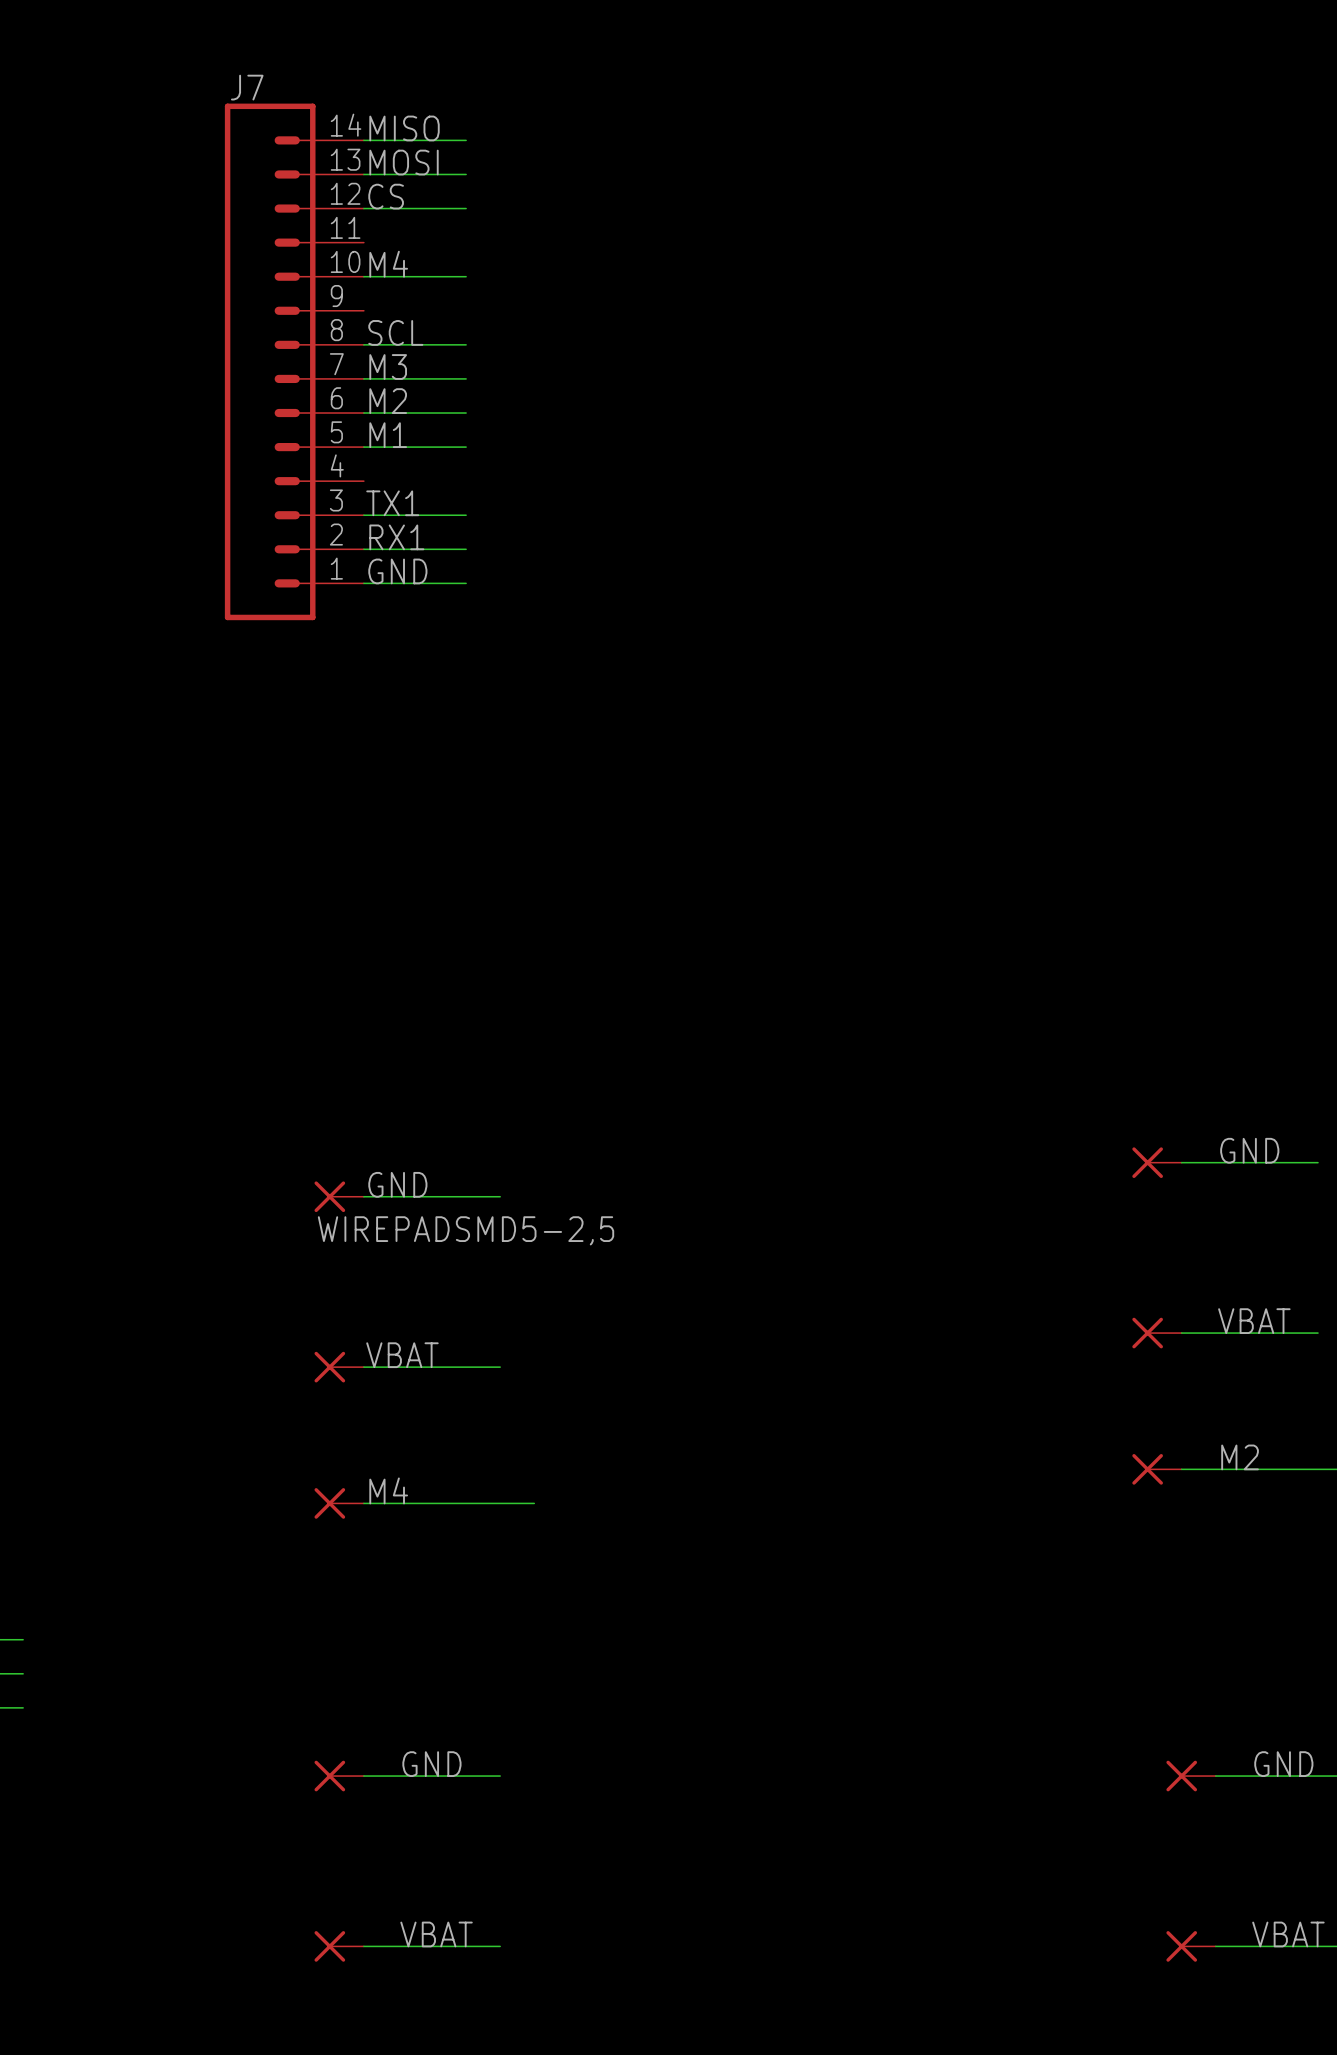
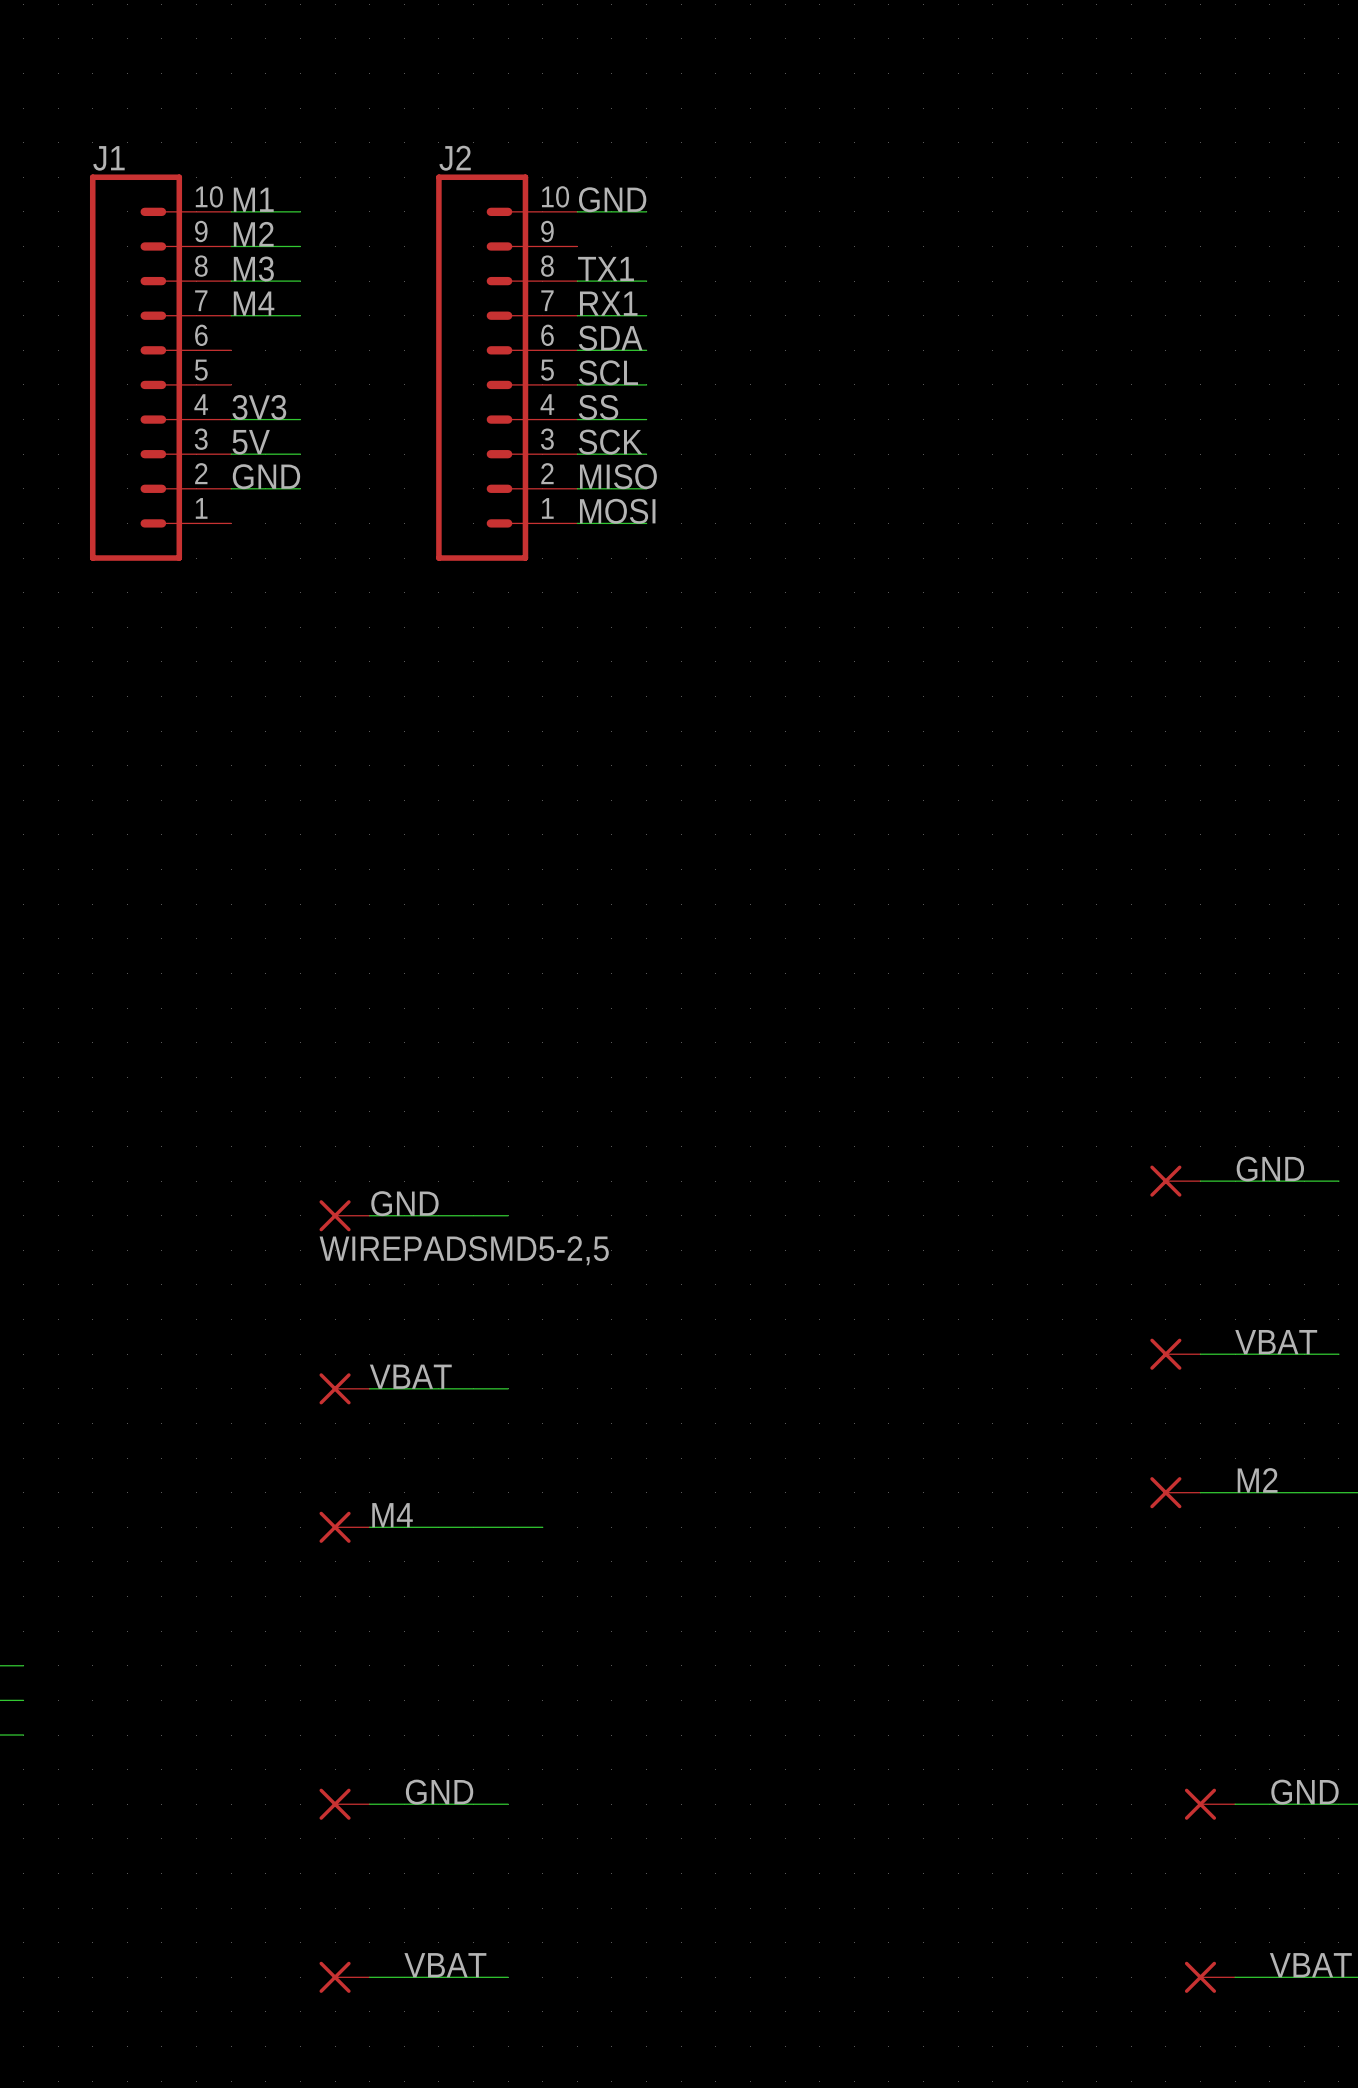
label: MISO (404, 128) -> none
wire: (363, 140) (466, 140) -> none
label: MOSI (404, 162) -> none
wire: (363, 174) (466, 174) -> none
label: CS (386, 196) -> none
label: none -> GND (612, 199)
wire: none -> (231, 211) (300, 211)
wire: (363, 208) (466, 208) -> none
wire: none -> (577, 211) (646, 211)
wire: none -> (231, 246) (300, 246)
label position: M4 (388, 264) -> M4 (254, 303)
wire: none -> (231, 281) (300, 281)
wire: (363, 276) (466, 276) -> none
wire: none -> (577, 281) (646, 281)
wire: none -> (231, 315) (300, 315)
wire: none -> (577, 315) (646, 315)
label position: SCL (395, 332) -> SCL (608, 372)
label: none -> SDA (610, 338)
wire: (363, 344) (466, 344) -> none
wire: none -> (577, 350) (646, 350)
J1: none -> (160, 367)
J7: (294, 361) -> none
J2: none -> (506, 367)
label position: M3 (388, 367) -> M3 (253, 268)
wire: (363, 378) (466, 378) -> none
wire: none -> (577, 384) (646, 384)
label: none -> 3V3 (259, 407)
label position: M2 (388, 401) -> M2 (253, 234)
label: none -> SS (598, 407)
wire: none -> (231, 419) (300, 419)
wire: (363, 413) (466, 413) -> none
wire: none -> (577, 419) (646, 419)
label: none -> 5V (251, 442)
label position: M1 (388, 435) -> M1 (253, 199)
label: none -> SCK (610, 442)
wire: none -> (231, 454) (300, 454)
wire: (363, 447) (466, 447) -> none
wire: none -> (577, 454) (646, 454)
label: none -> MISO (618, 476)
wire: none -> (231, 488) (300, 488)
wire: none -> (577, 488) (646, 488)
label position: TX1 (392, 503) -> TX1 (606, 268)
label: none -> MOSI (617, 511)
wire: (363, 515) (466, 515) -> none
wire: none -> (577, 523) (646, 523)
label position: RX1 (396, 537) -> RX1 (608, 303)
wire: (363, 549) (466, 549) -> none
label position: GND (397, 571) -> GND (266, 476)
wire: (363, 583) (466, 583) -> none

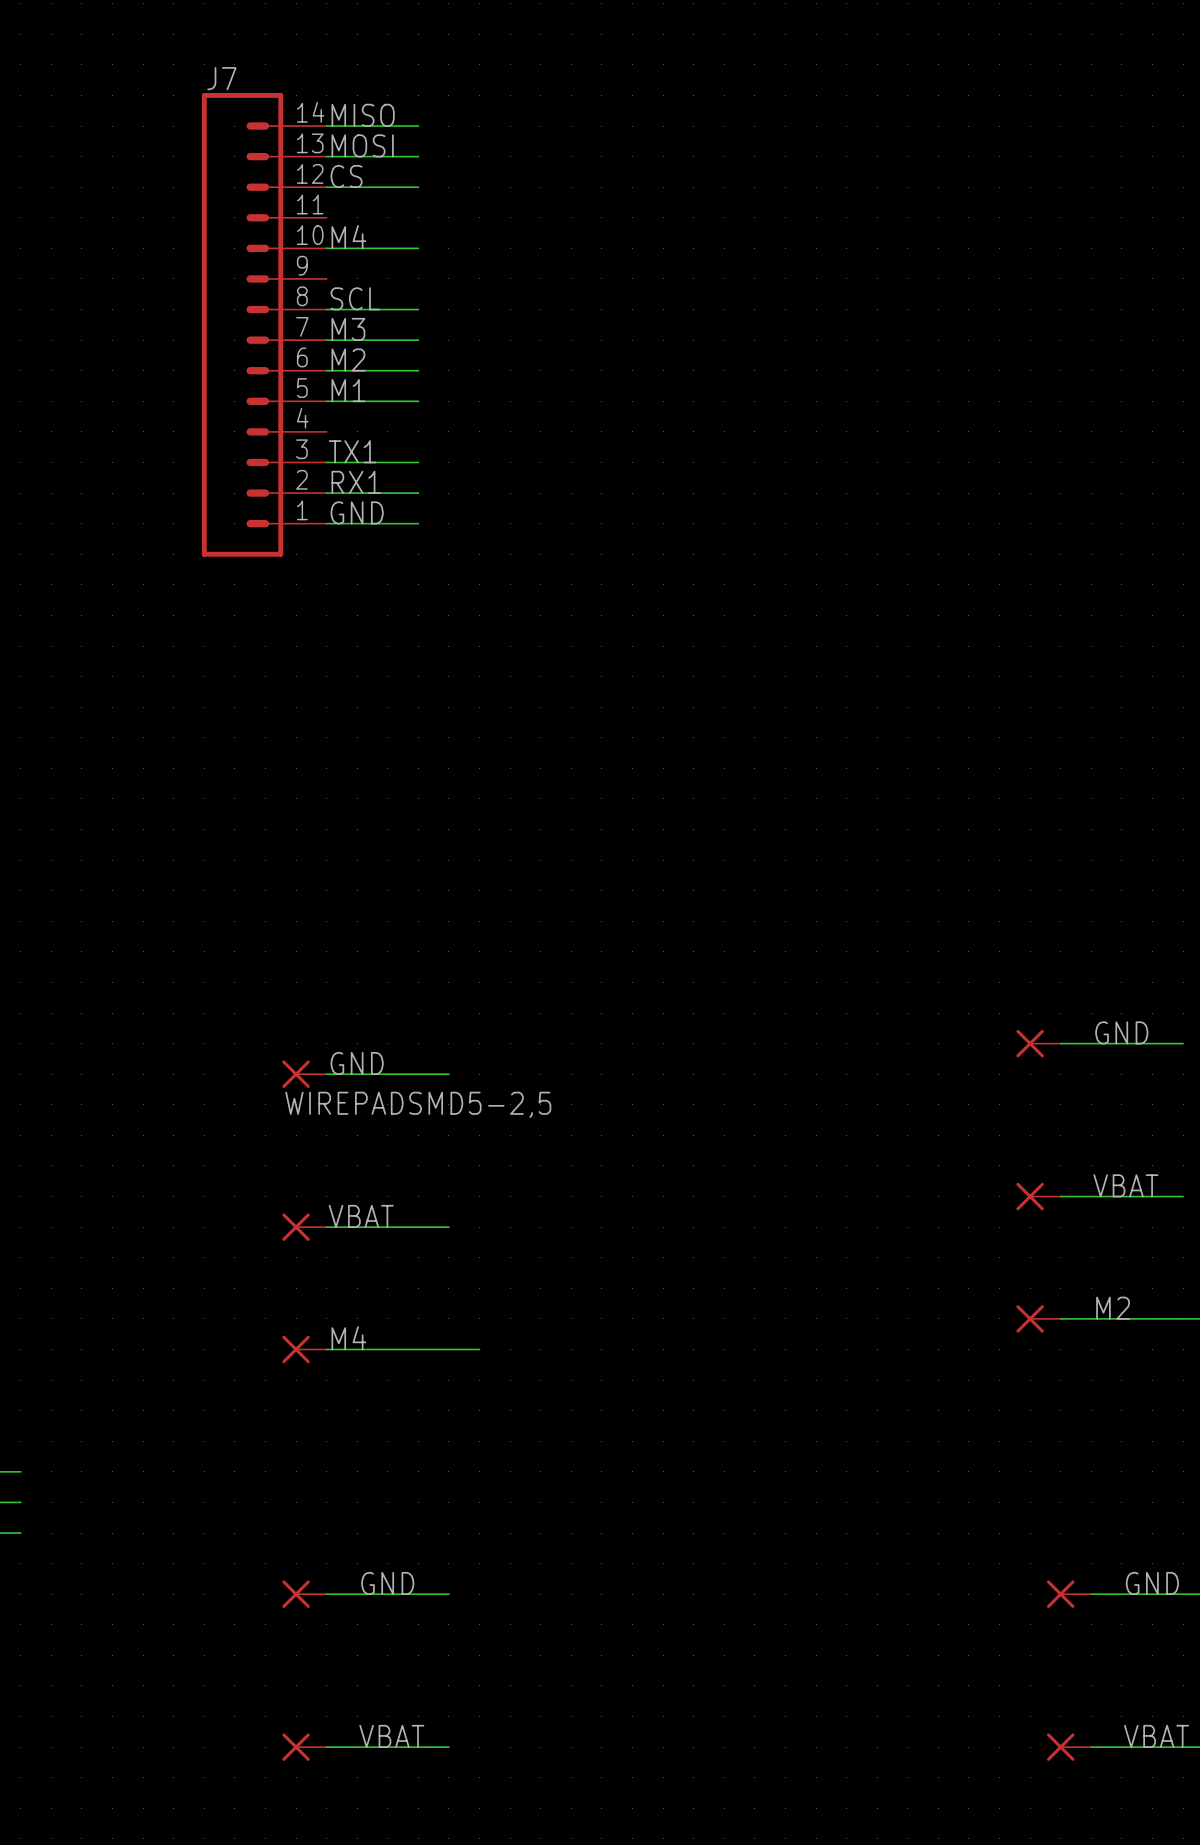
label: none -> MISO (363, 115)
wire: none -> (326, 126) (418, 126)
label: none -> MOSI (362, 145)
wire: none -> (326, 156) (418, 156)
label position: M1 (253, 199) -> M1 (348, 390)
label: none -> CS (346, 176)
label: GND (612, 199) -> none
wire: (231, 211) (300, 211) -> none
wire: none -> (326, 187) (418, 187)
wire: (577, 211) (646, 211) -> none
label position: M2 (253, 234) -> M2 (348, 360)
wire: (231, 246) (300, 246) -> none
label position: M3 (253, 268) -> M3 (348, 329)
label position: TX1 (606, 268) -> TX1 (352, 451)
wire: (231, 281) (300, 281) -> none
wire: none -> (326, 248) (418, 248)
wire: (577, 281) (646, 281) -> none
label position: M4 (254, 303) -> M4 (348, 237)
label position: RX1 (608, 303) -> RX1 (356, 482)
wire: (231, 315) (300, 315) -> none
wire: (577, 315) (646, 315) -> none
label: SDA (610, 338) -> none
wire: none -> (326, 309) (418, 309)
wire: (577, 350) (646, 350) -> none
J1: (160, 367) -> none
J7: none -> (264, 324)
J2: (506, 367) -> none
label position: SCL (608, 372) -> SCL (355, 298)
wire: none -> (326, 340) (418, 340)
wire: (577, 384) (646, 384) -> none
label: 3V3 (259, 407) -> none
label: SS (598, 407) -> none
wire: (231, 419) (300, 419) -> none
wire: none -> (326, 370) (418, 370)
wire: (577, 419) (646, 419) -> none
label: 5V (251, 442) -> none
label: SCK (610, 442) -> none
wire: (231, 454) (300, 454) -> none
wire: none -> (326, 401) (418, 401)
wire: (577, 454) (646, 454) -> none
label position: GND (266, 476) -> GND (357, 512)
label: MISO (618, 476) -> none
wire: (231, 488) (300, 488) -> none
wire: (577, 488) (646, 488) -> none
label: MOSI (617, 511) -> none
wire: none -> (326, 462) (418, 462)
wire: (577, 523) (646, 523) -> none
wire: none -> (326, 493) (418, 493)
wire: none -> (326, 523) (418, 523)

